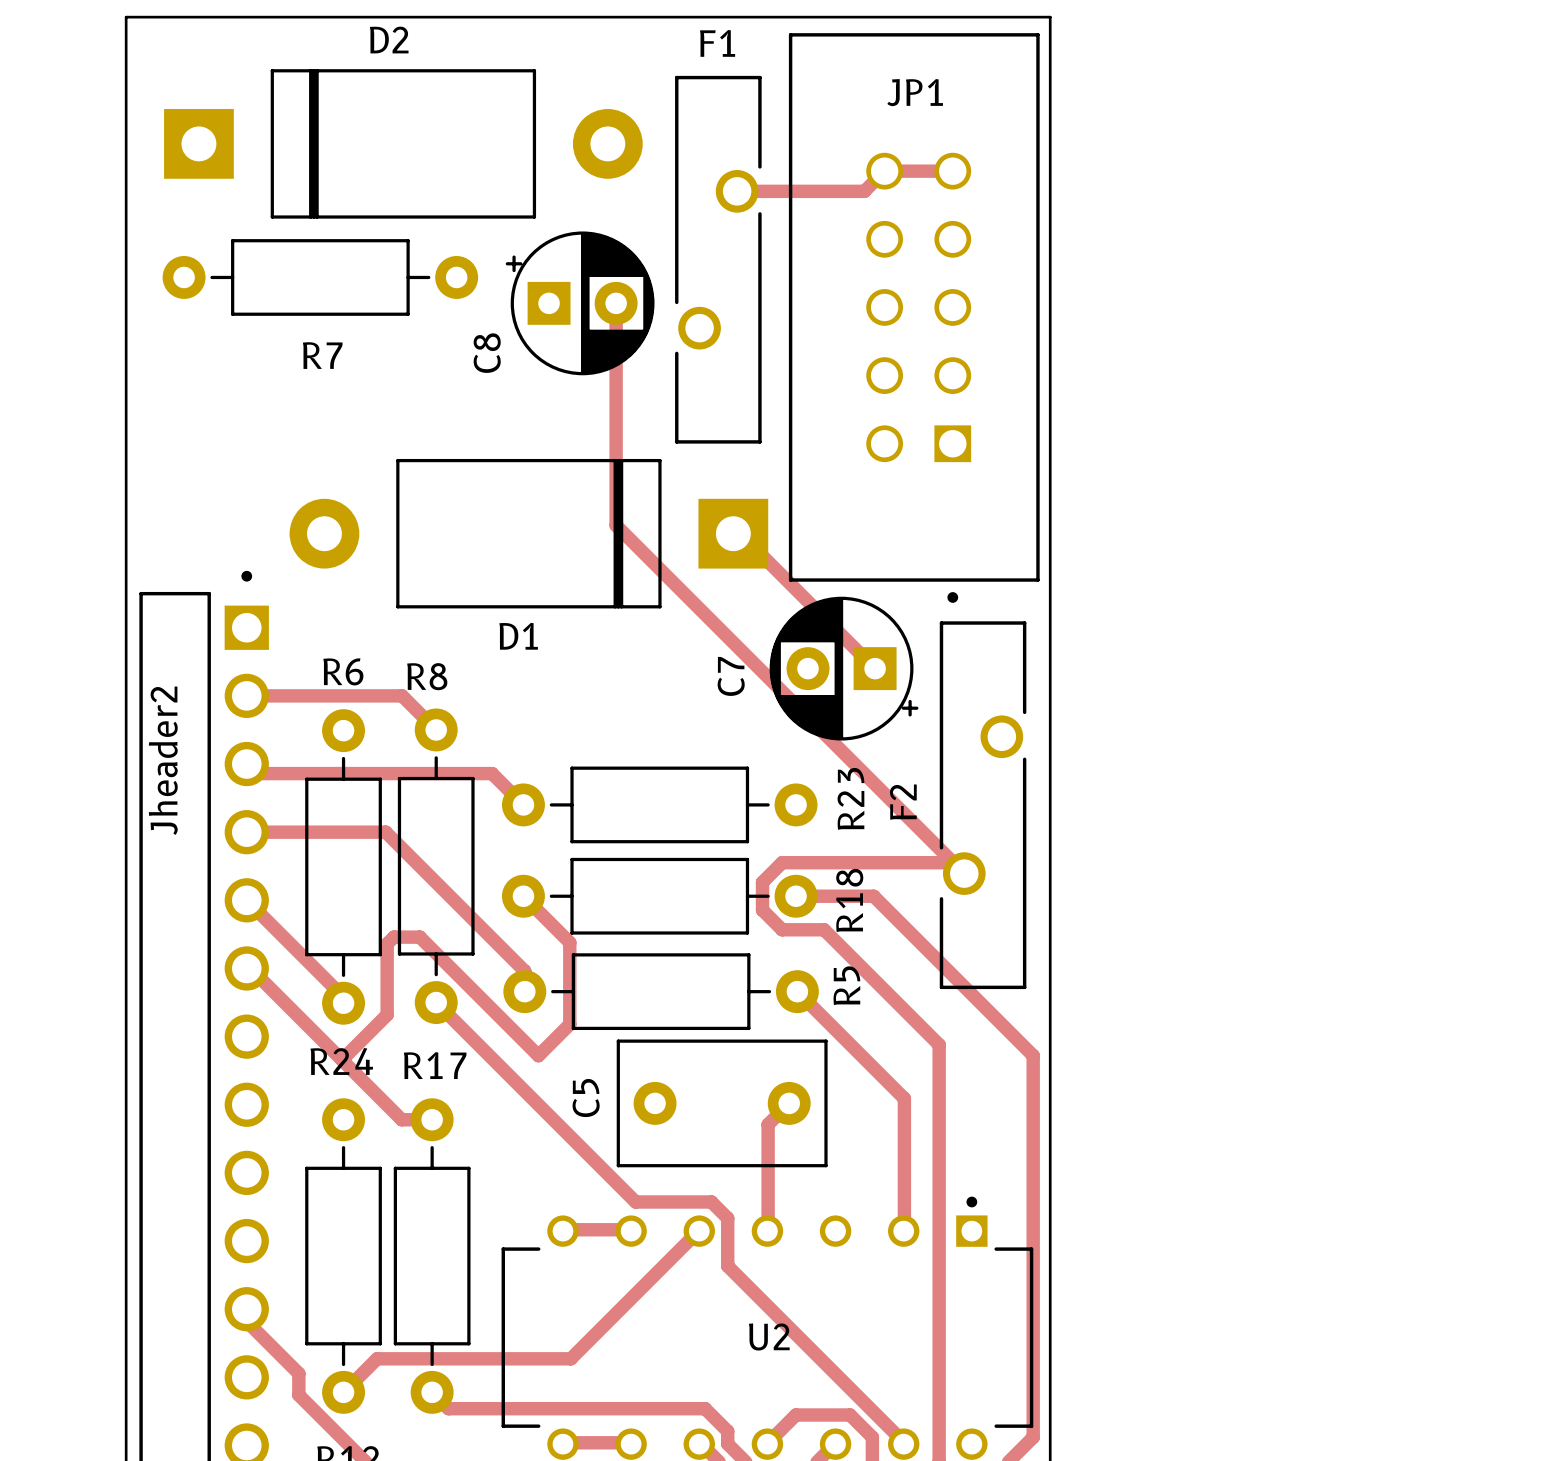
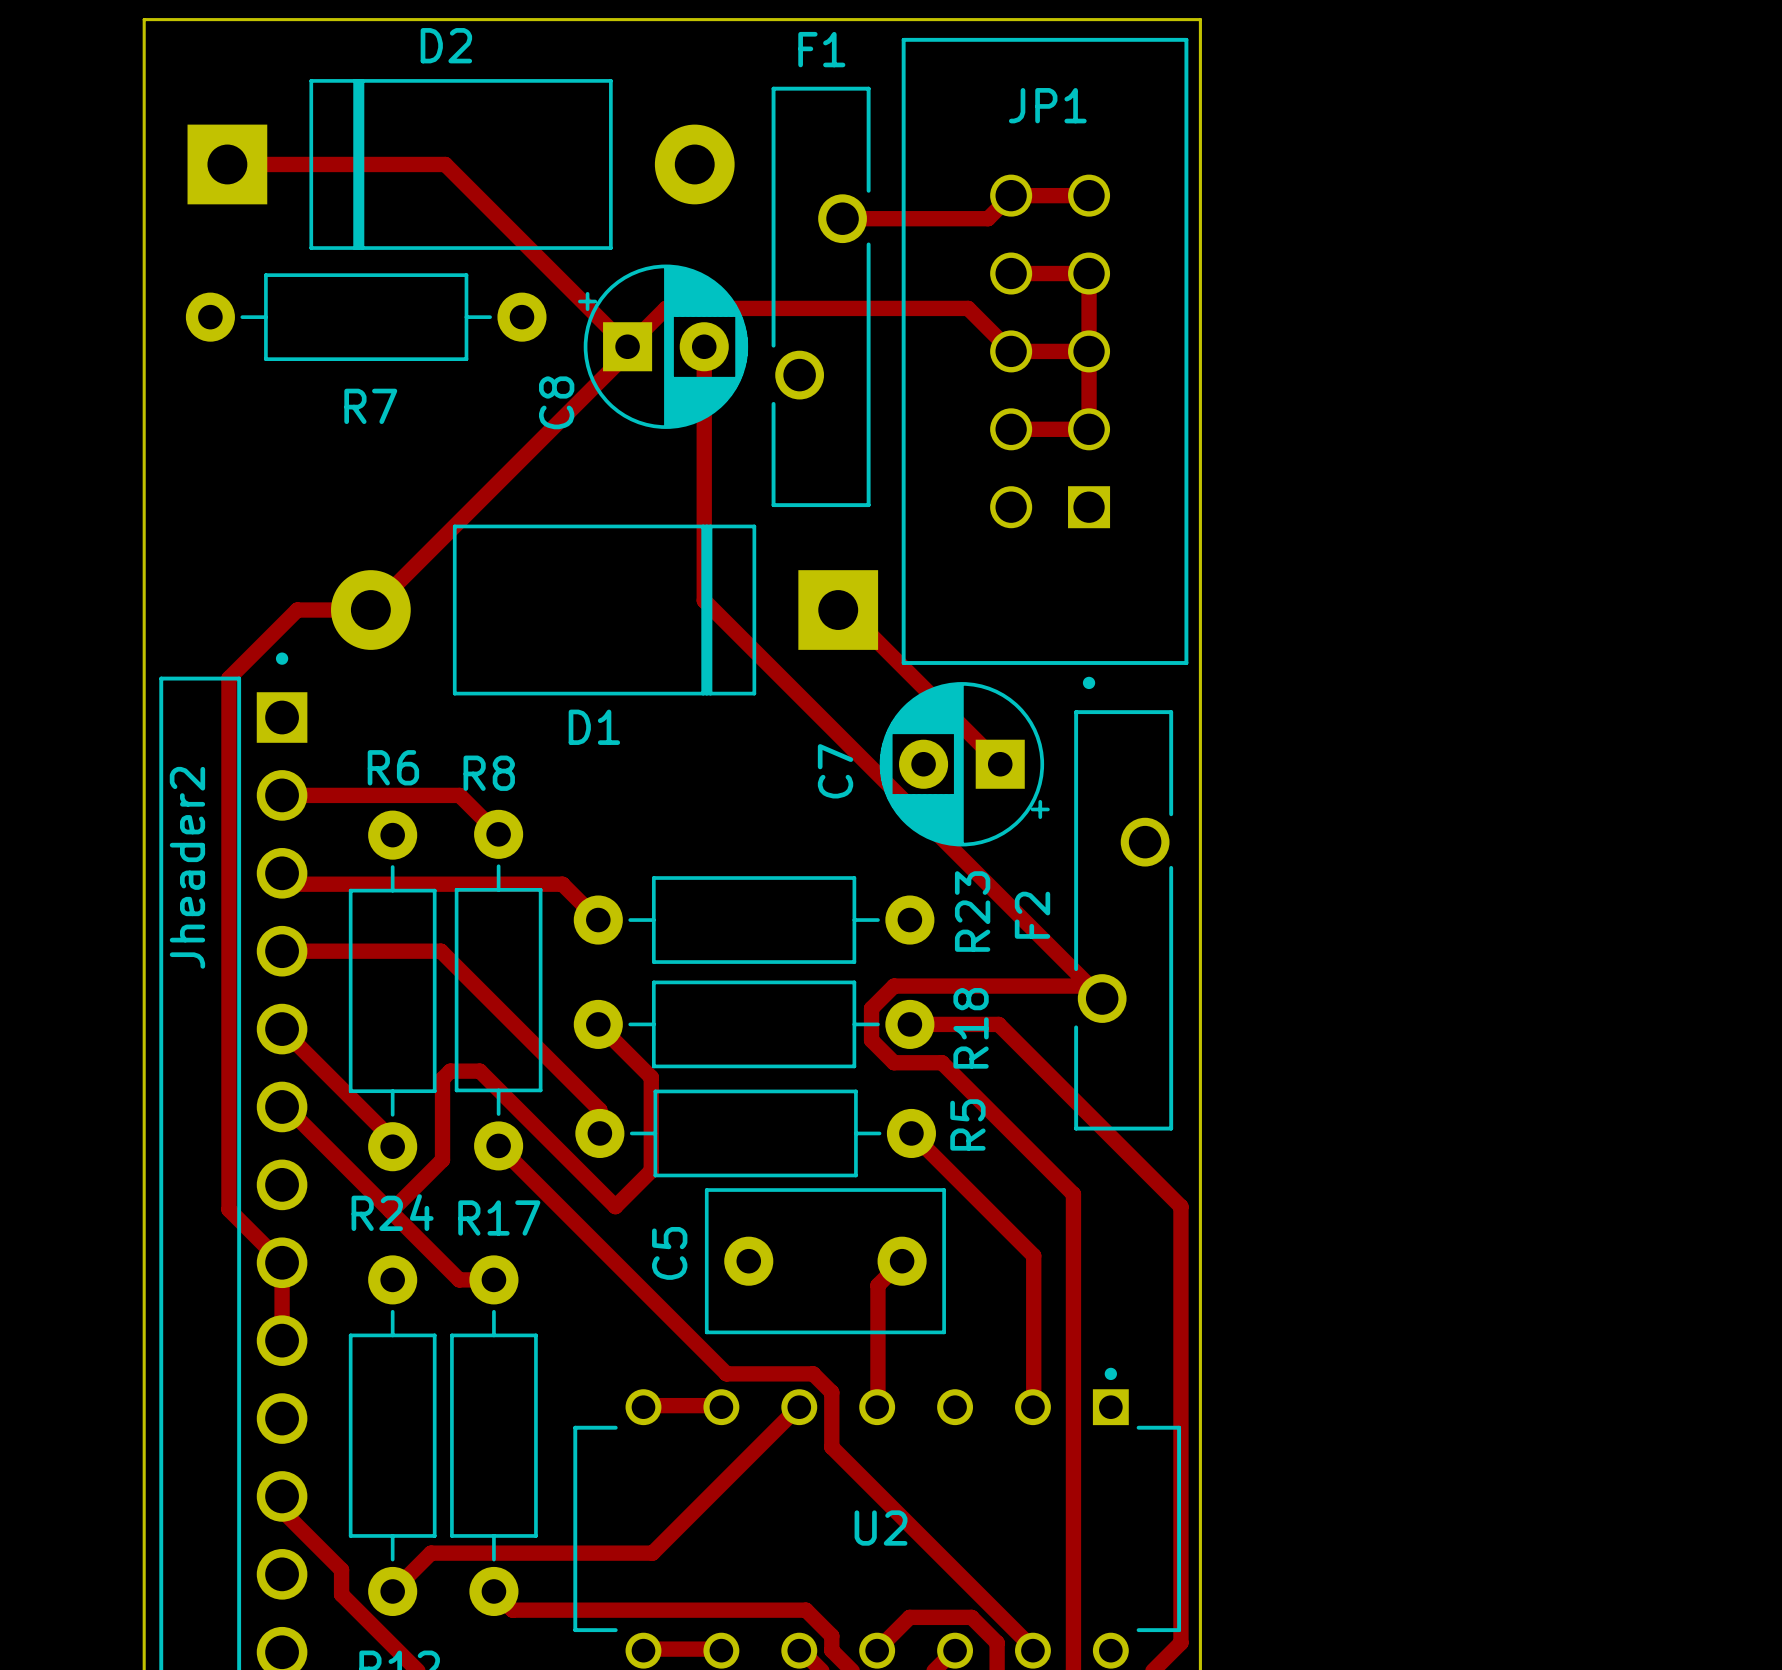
track: none -> (227, 164) (445, 164) (627, 346)
track: none -> (1011, 273) (1089, 273) (1089, 429) (1011, 429)
track: none -> (627, 346) (665, 308) (968, 308) (1011, 351) (1089, 351)
track: none -> (627, 346) (627, 353) (370, 610) (297, 610) (228, 678) (228, 1209) (282, 1262) (282, 1340)

